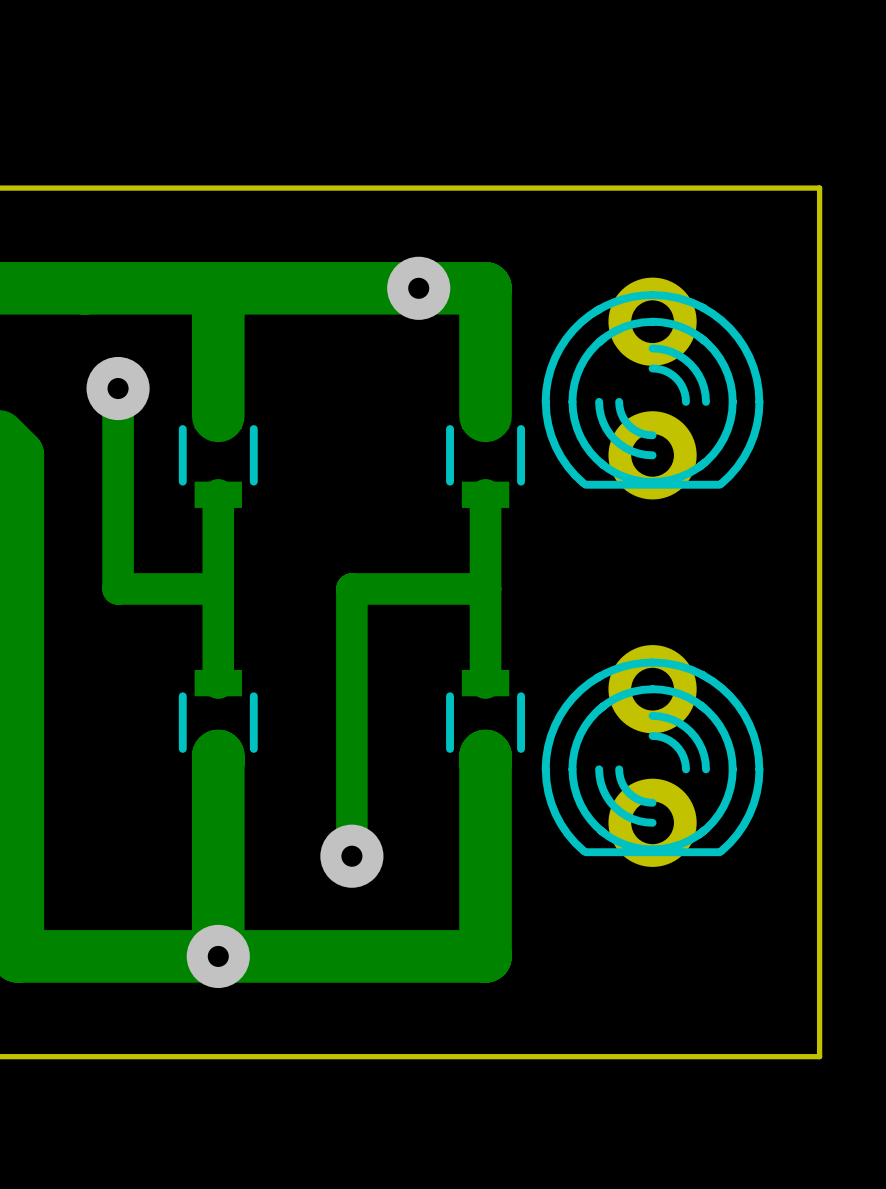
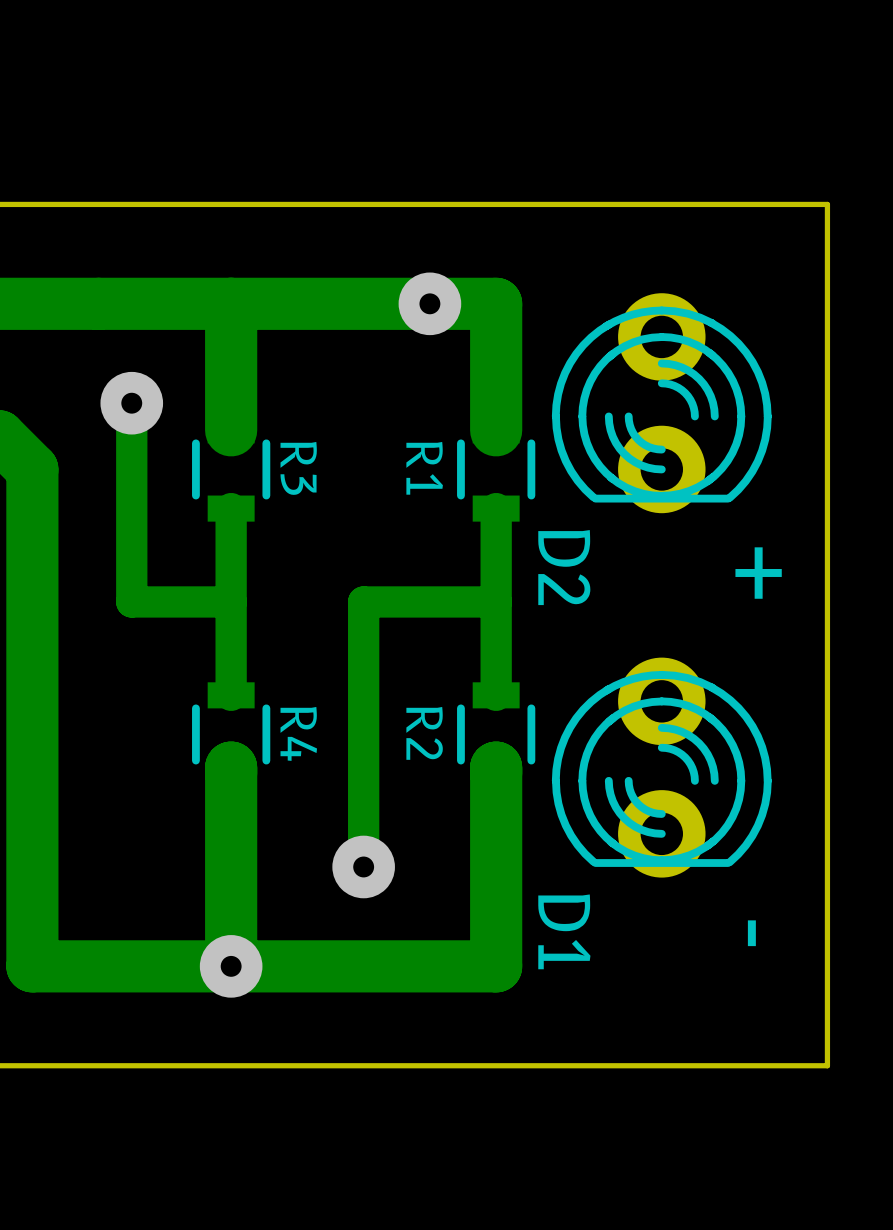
R3 name: none -> R3 (298, 468)
R1 name: none -> R1 (424, 468)
D2 name: none -> D2 (564, 567)
text: none -> + (758, 573)
R2 name: none -> R2 (424, 733)
R4 name: none -> R4 (298, 733)
D1 name: none -> D1 (564, 931)
text: none -> - (751, 933)

